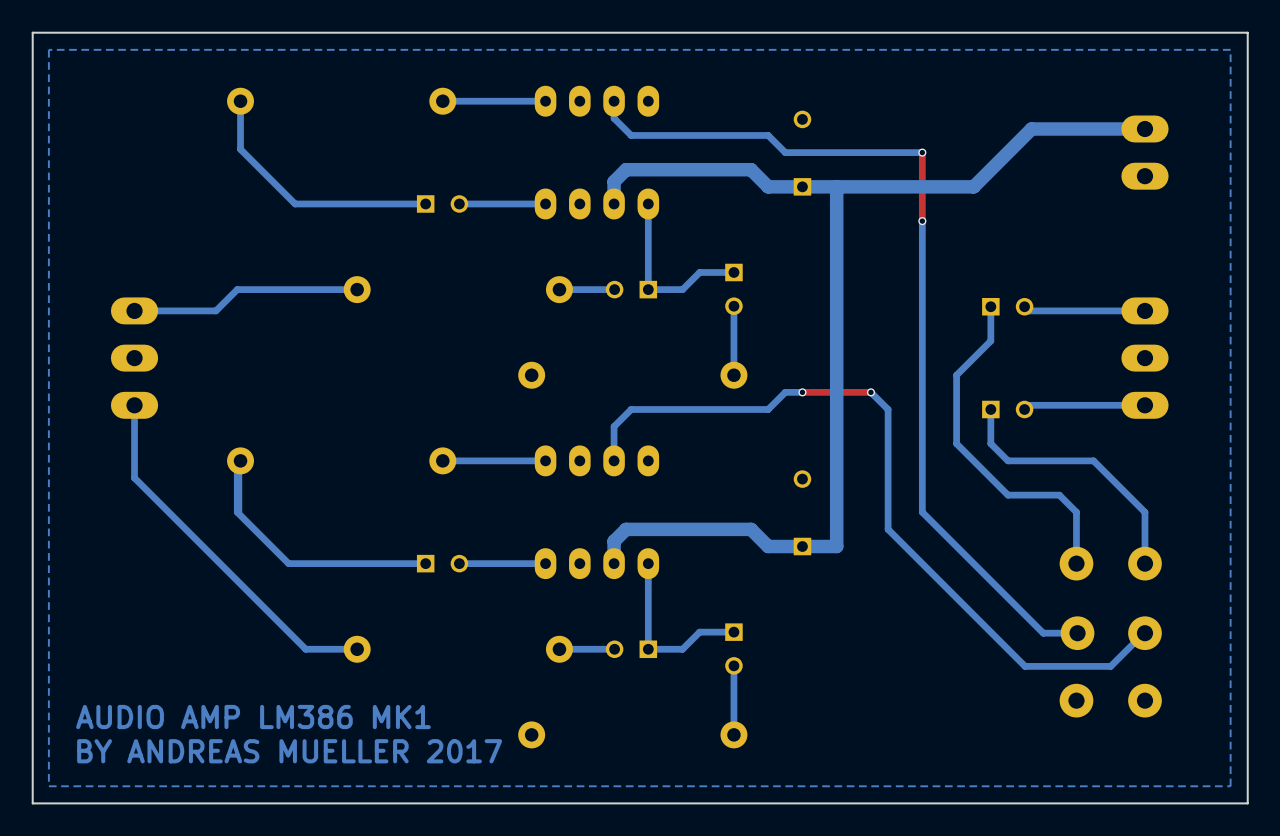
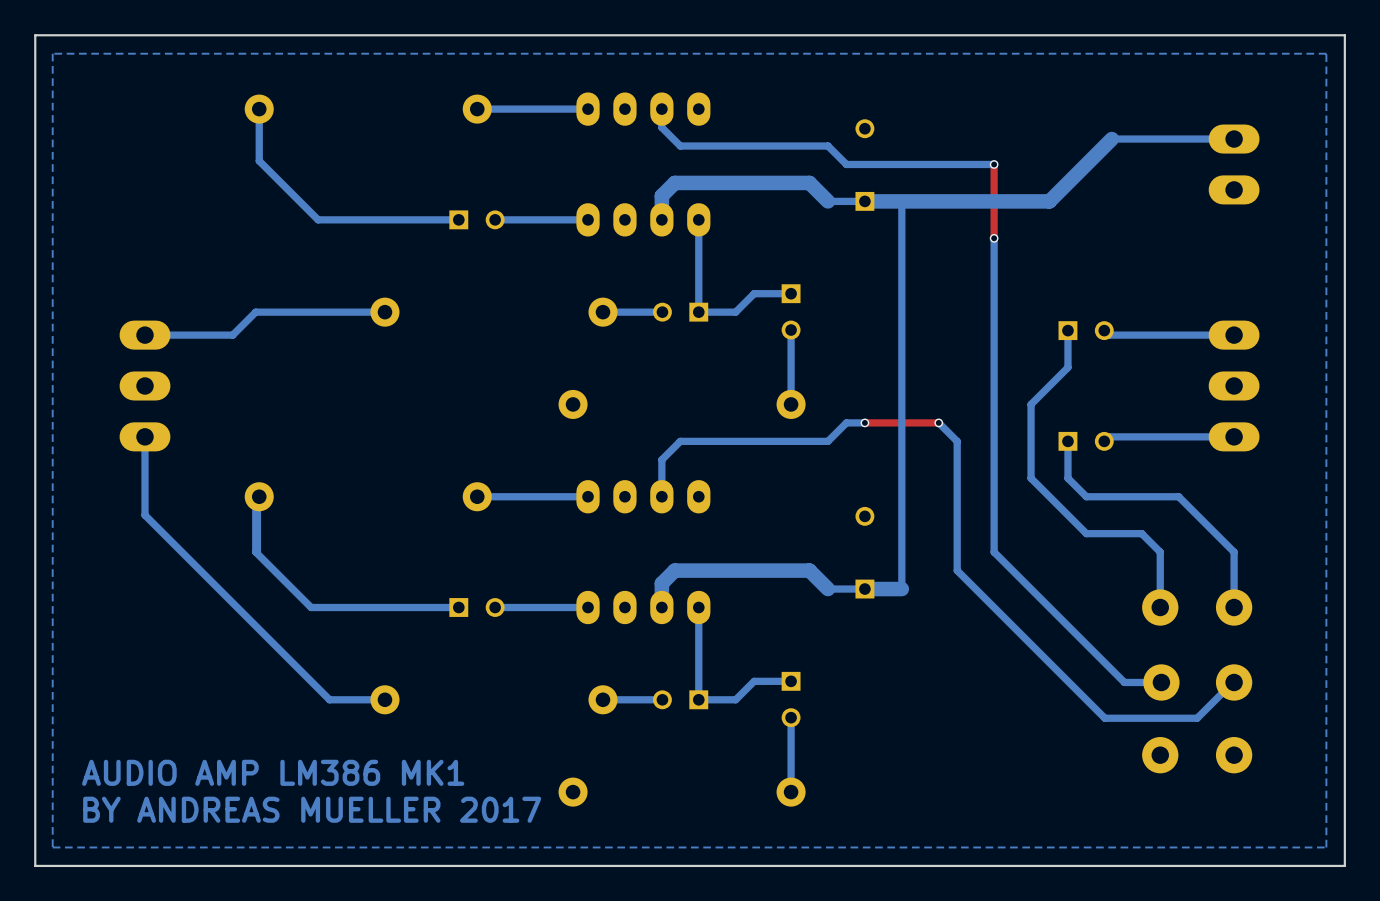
bottom track width: thick (1144, 129) (1031, 129) -> thin (1234, 139) (1111, 139)
bottom track width: thick (802, 186) (768, 186) -> thin (864, 201) (827, 201)
bottom track width: thick (836, 186) (836, 546) -> thin (901, 201) (901, 589)
bottom track width: thick (802, 546) (768, 546) -> thin (864, 589) (827, 589)

